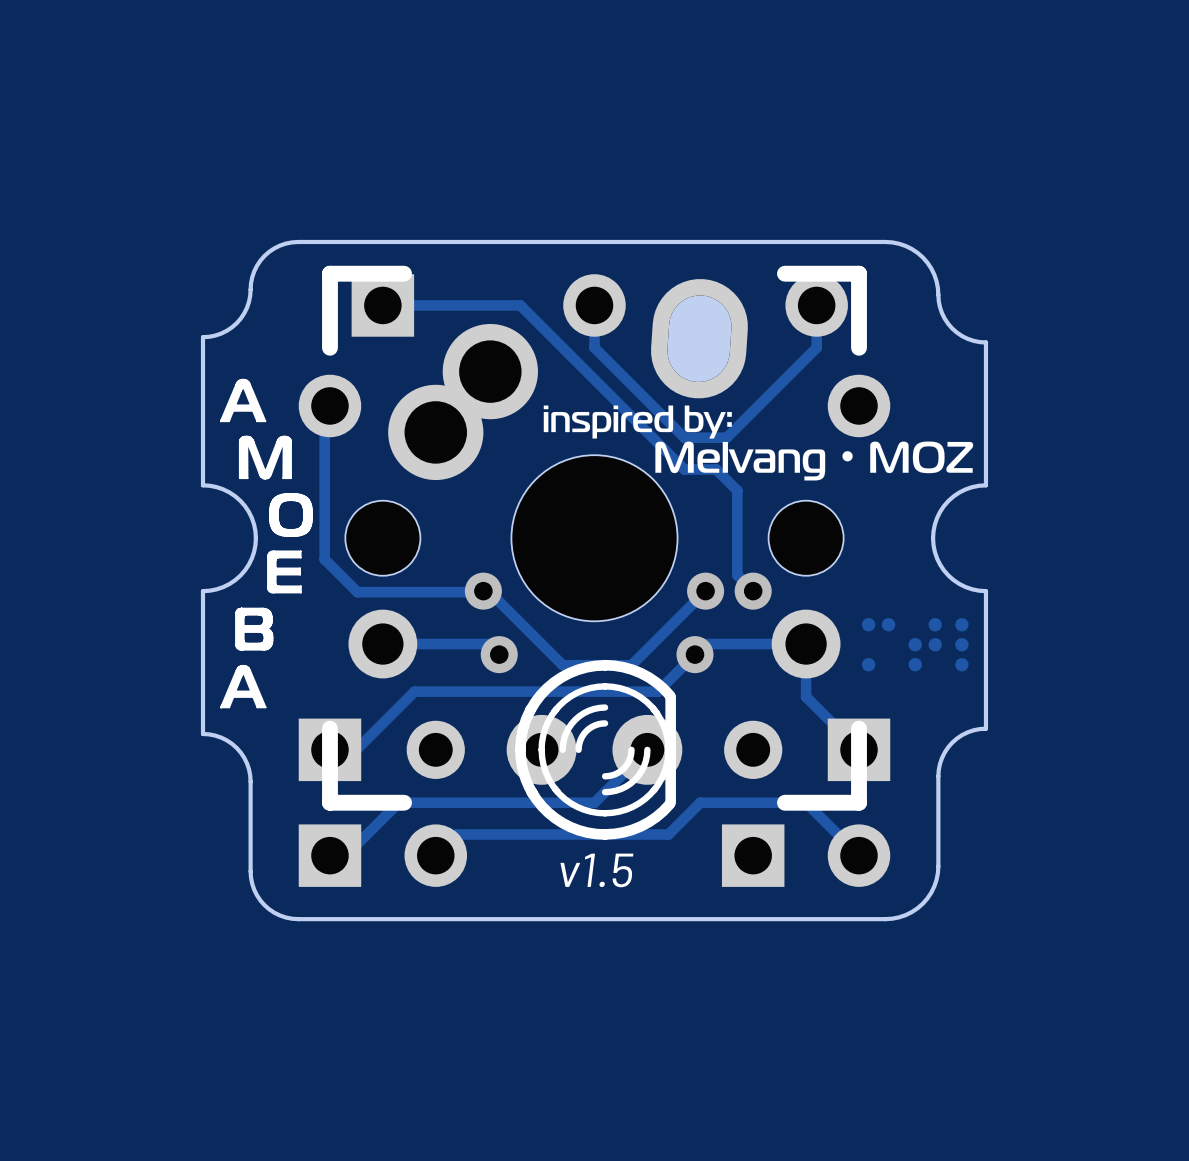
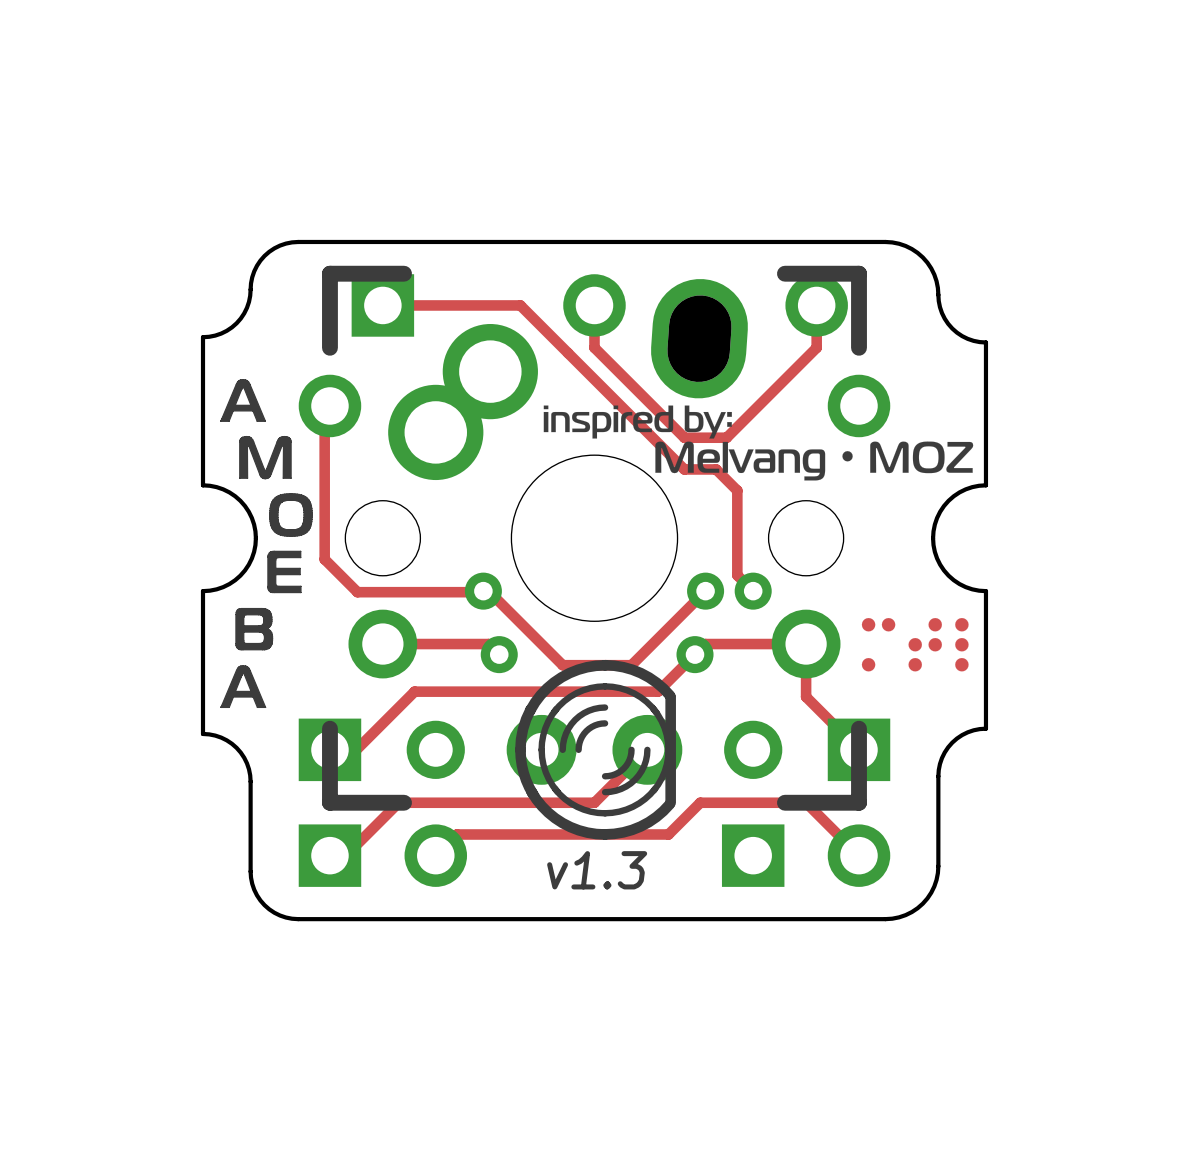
text: v1.5 (596, 870) -> v1.3 (597, 870)

